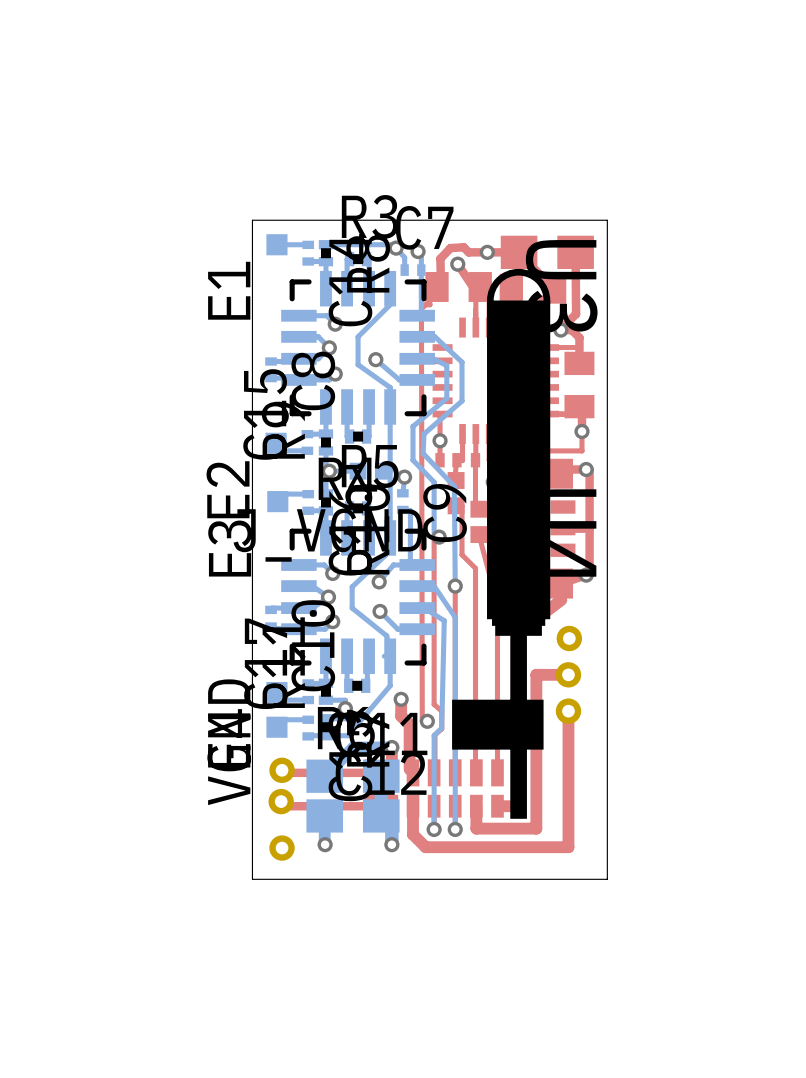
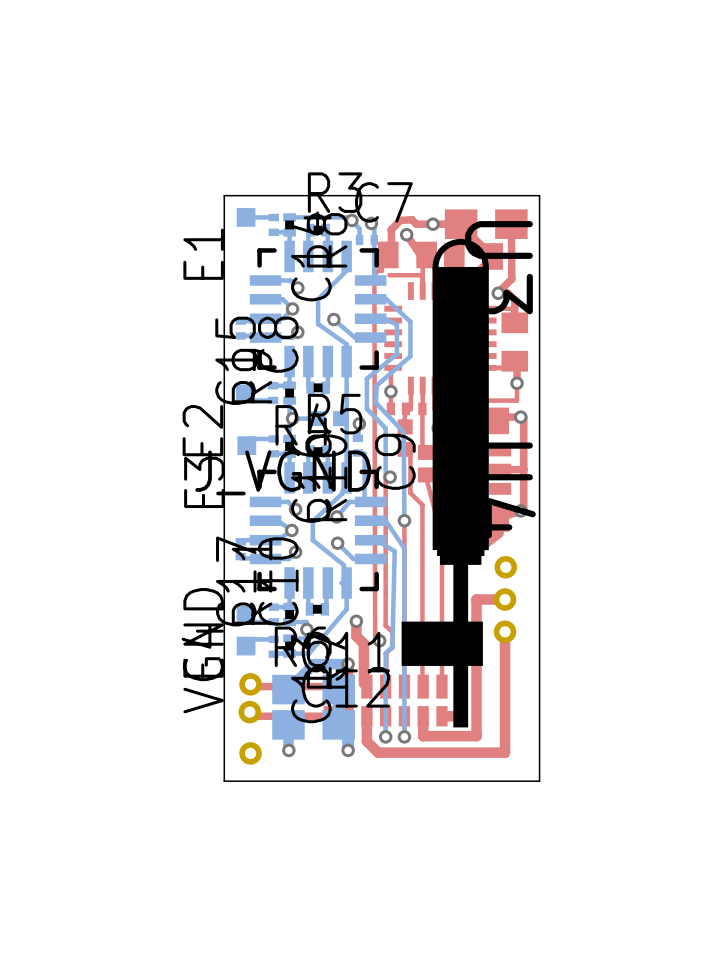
top track: none -> (422, 275) (389, 275)

